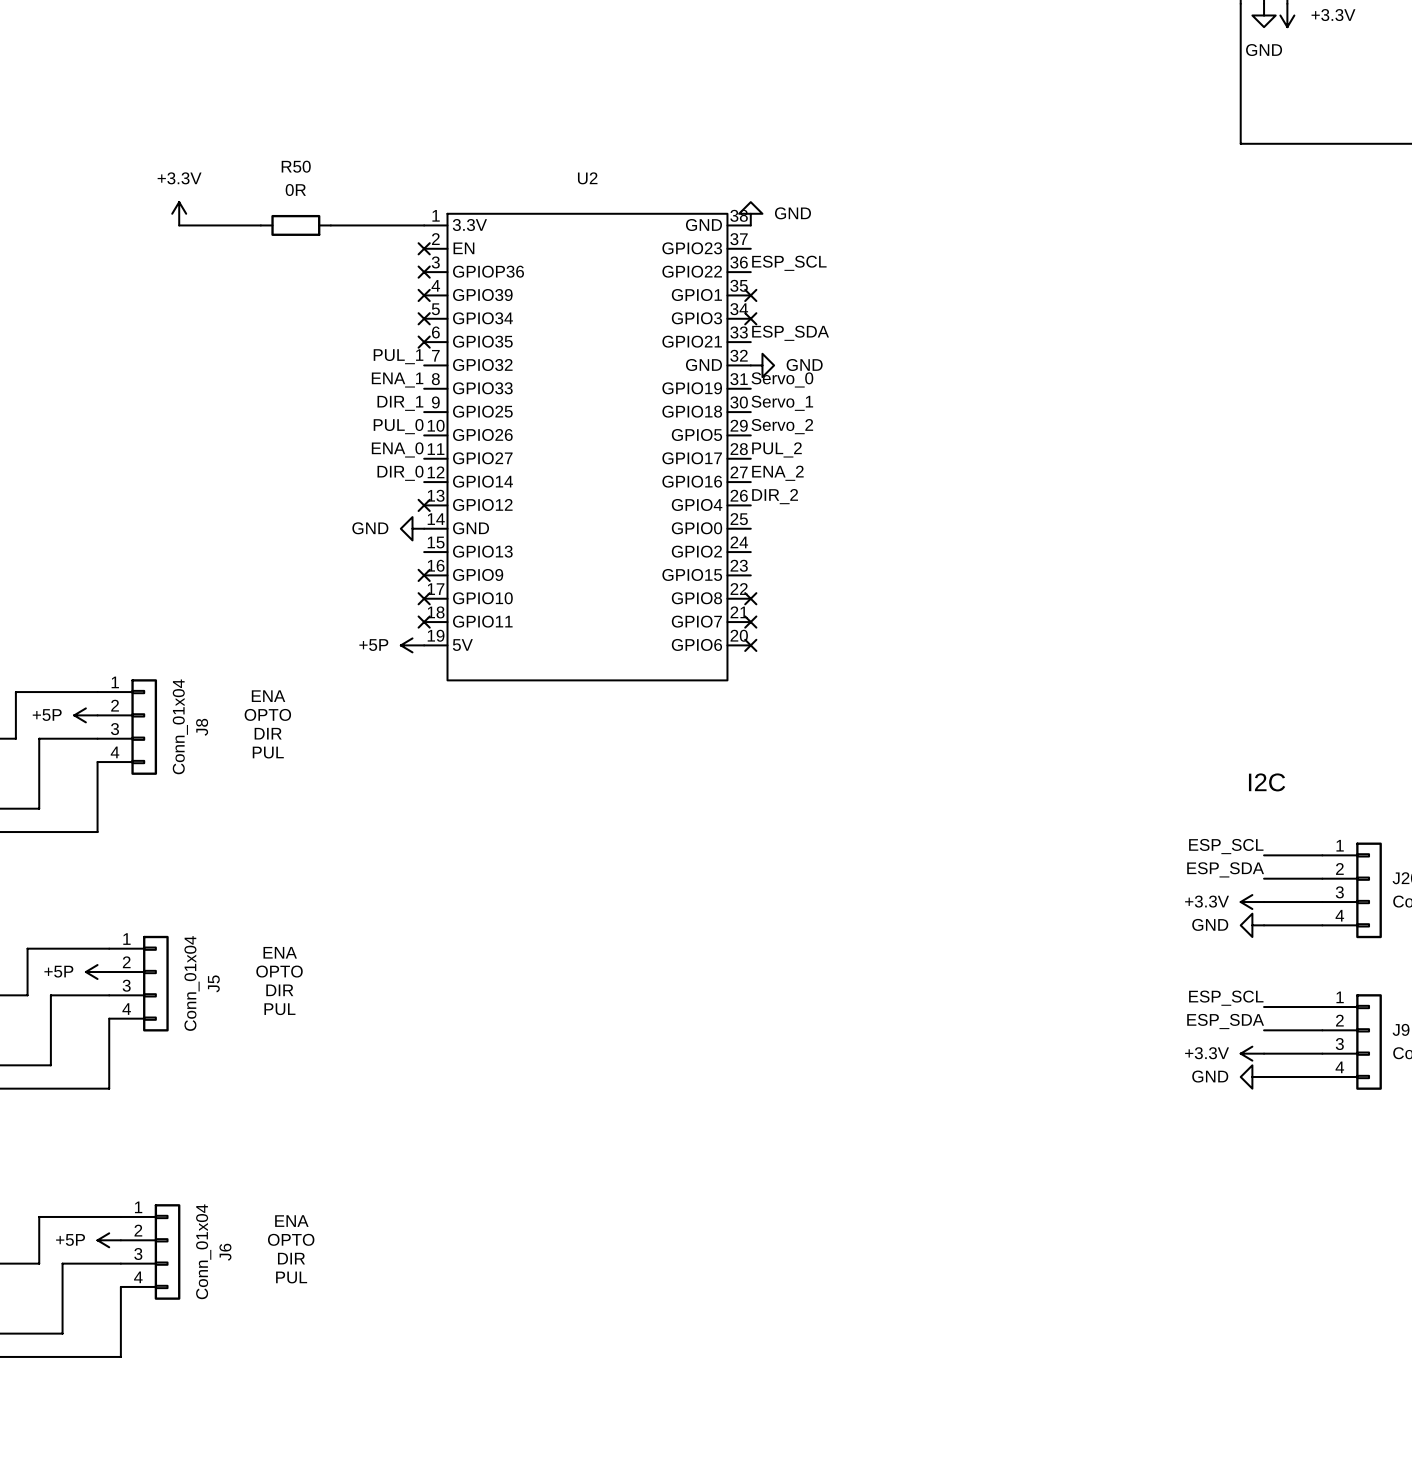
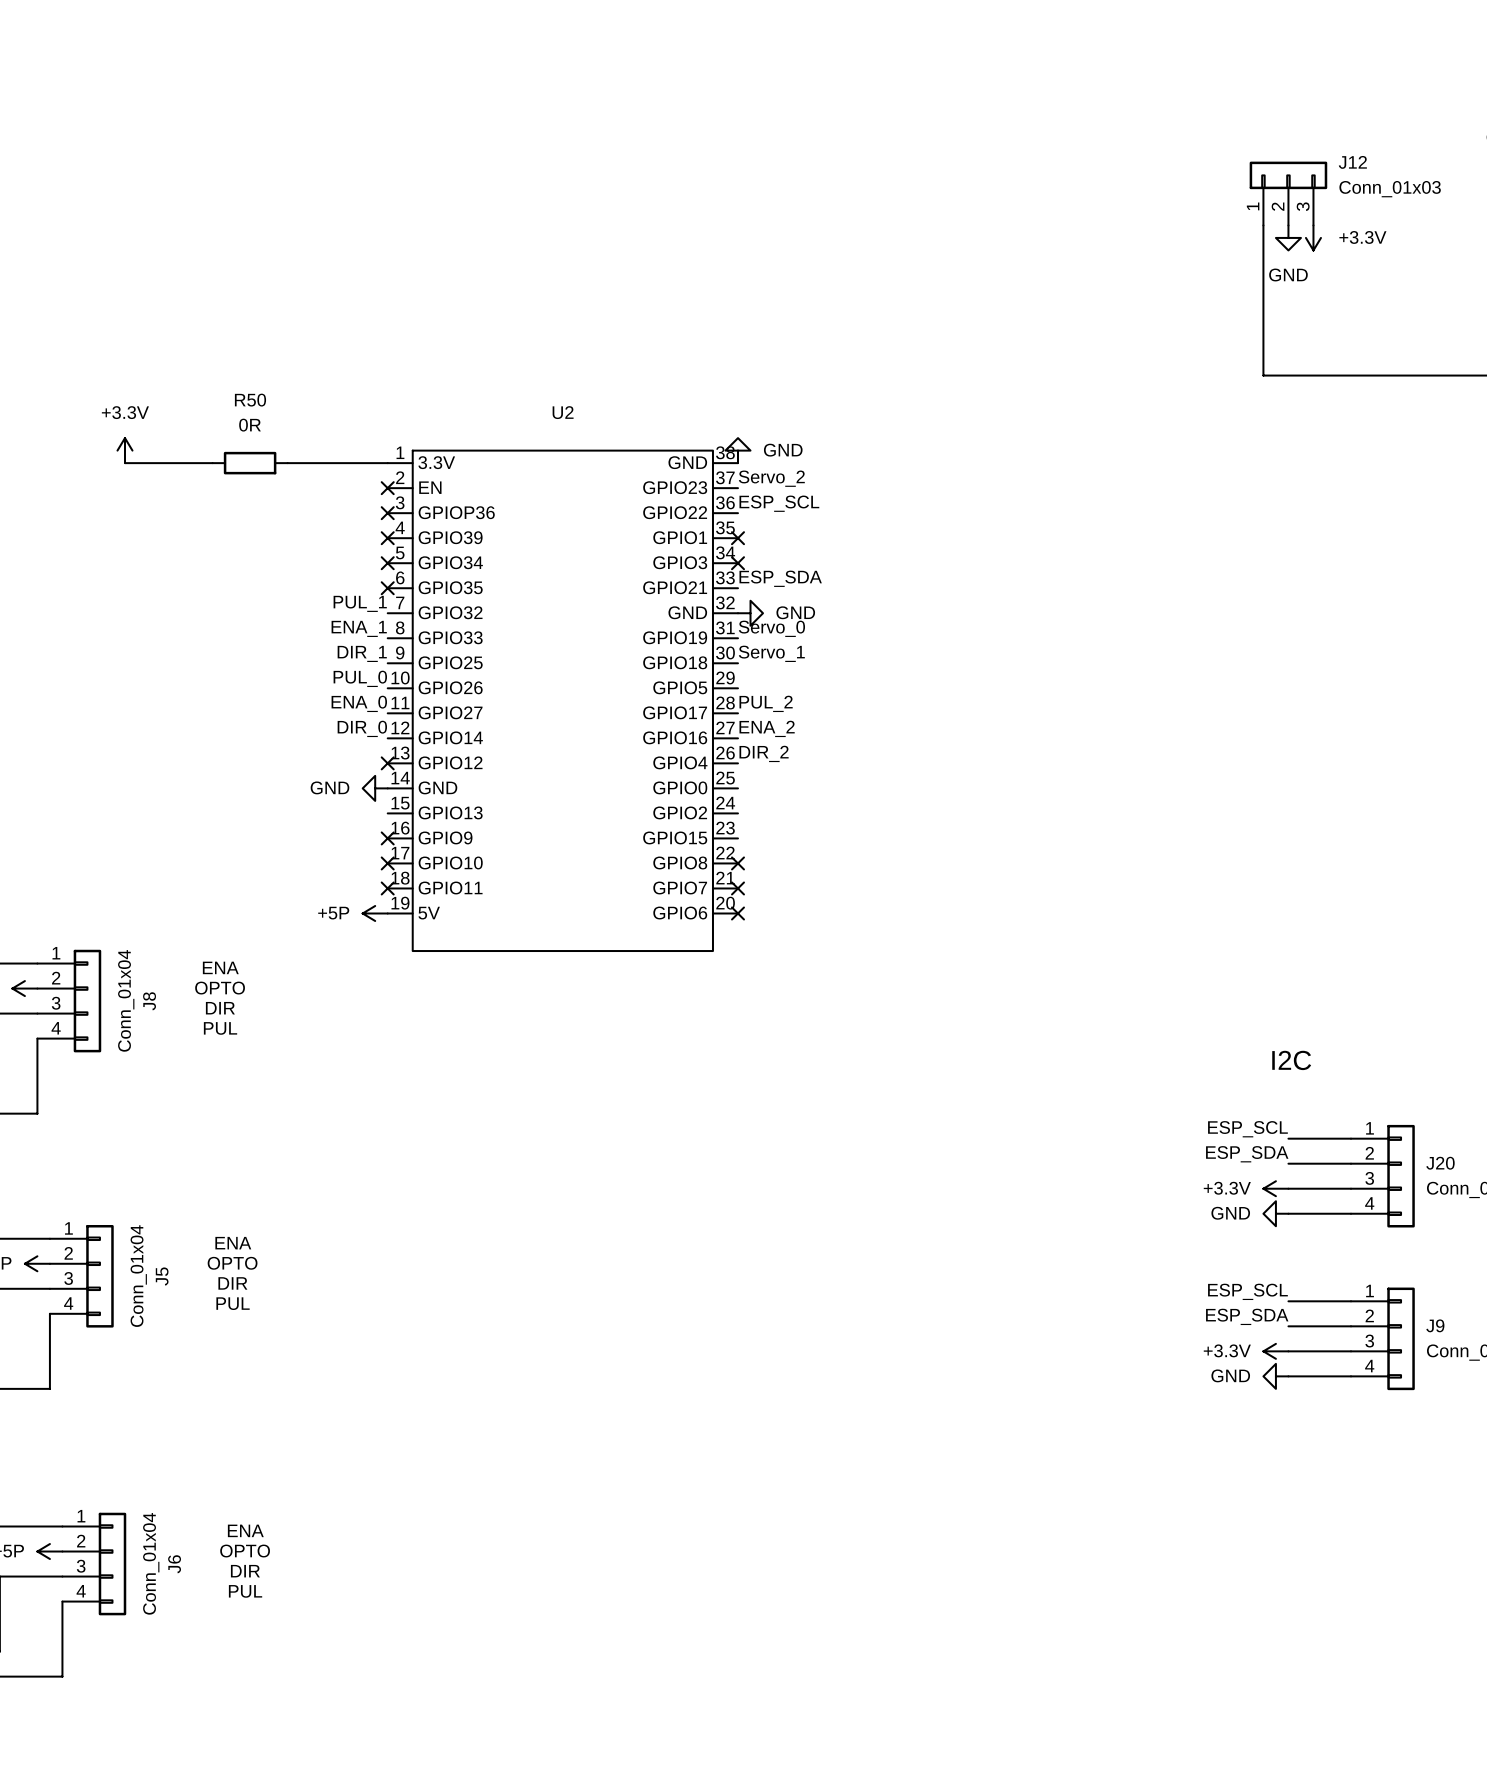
label position: Servo_2 (782, 426) -> Servo_2 (771, 478)

